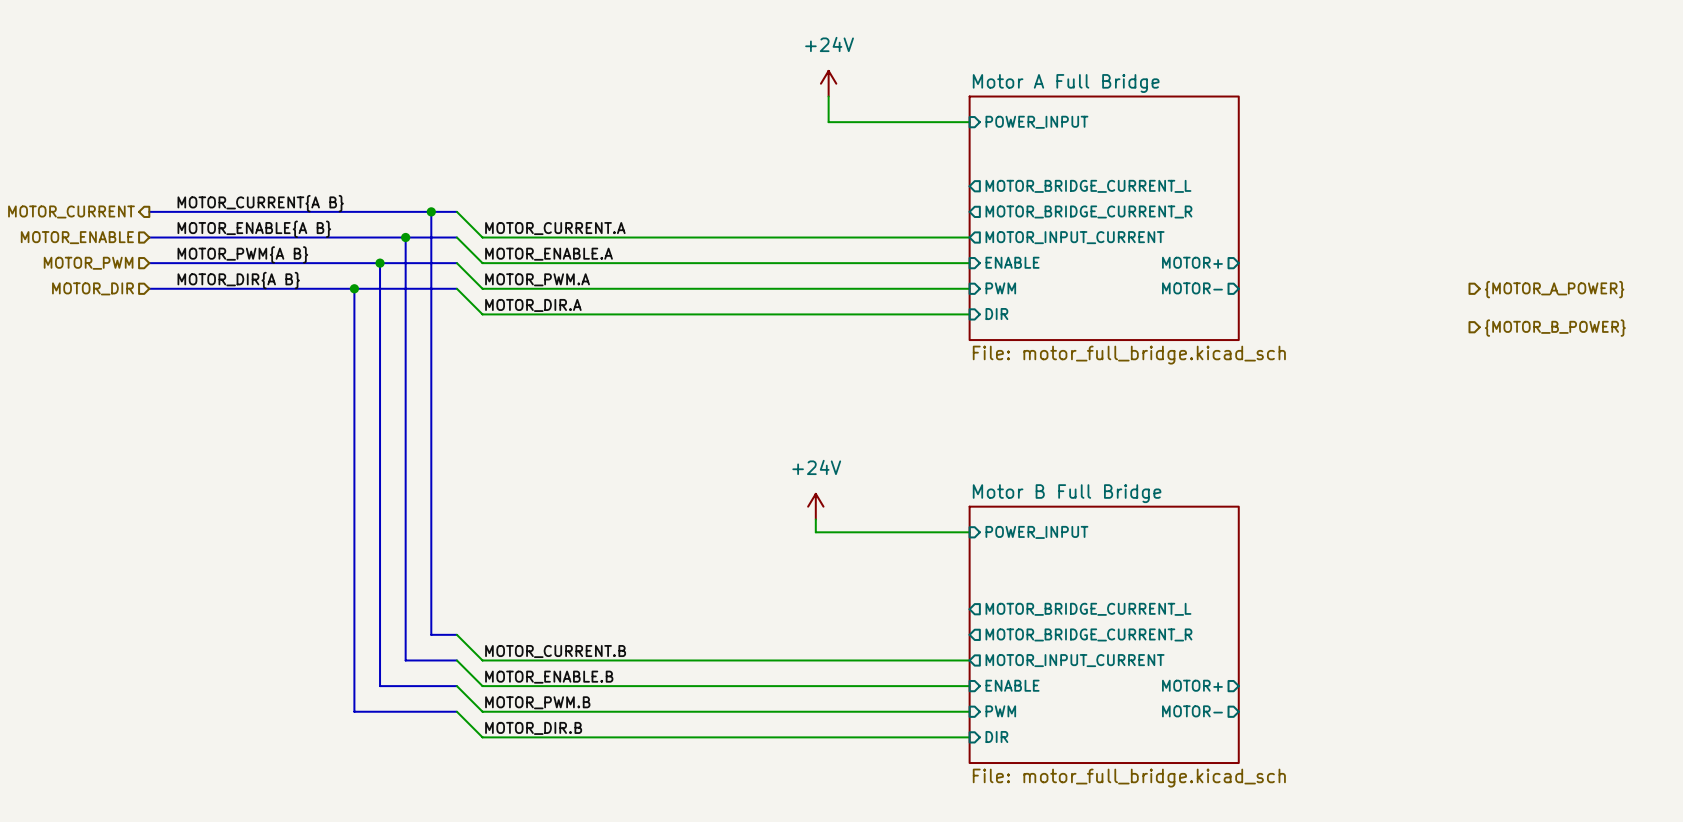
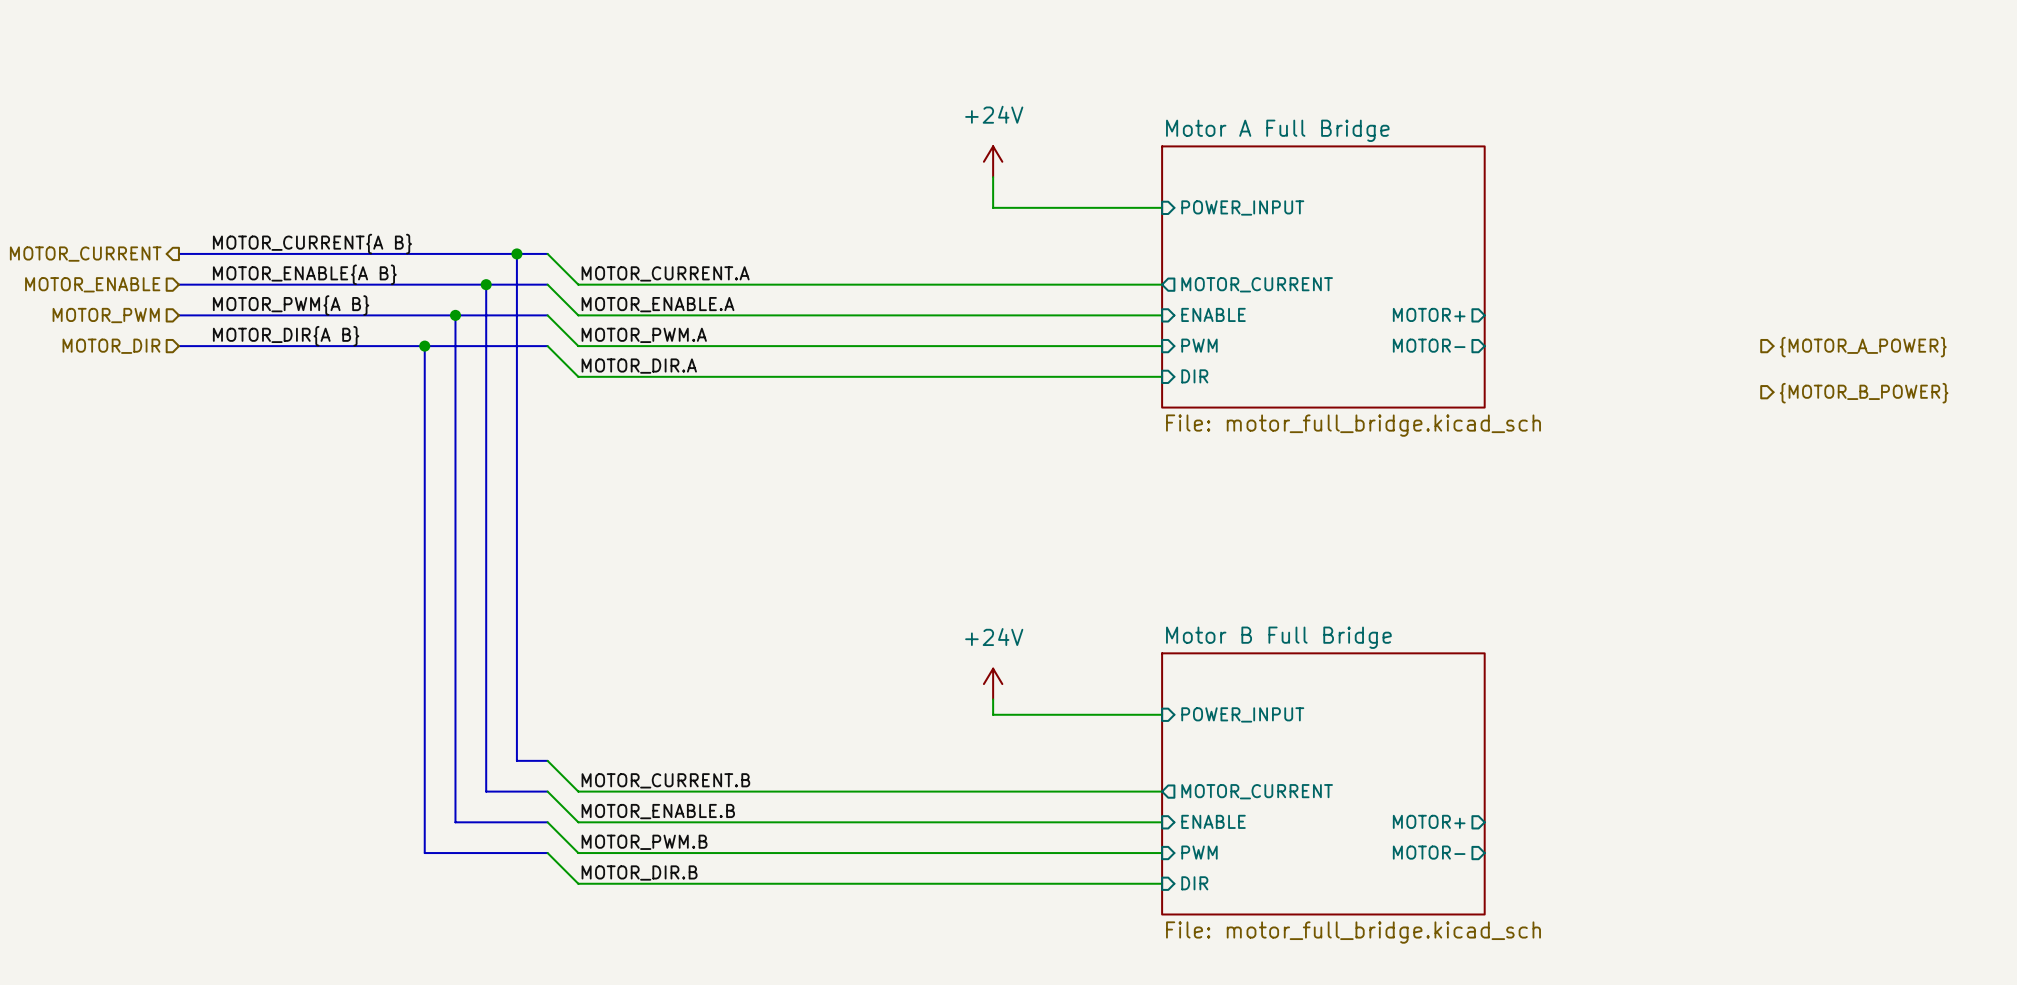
power symbol position: +24V (828, 83) -> +24V (993, 161)
wire: (828, 96) (828, 122) (969, 122) -> (993, 177) (993, 207) (1162, 207)
sheet pin position: POWER_INPUT (1036, 122) -> POWER_INPUT (1242, 207)
sheet pin: MOTOR_BRIDGE_CURRENT_L (1088, 186) -> none
sheet pin: MOTOR_BRIDGE_CURRENT_R (1088, 211) -> none
sheet Motor A Full Bridge: File: motor_full_bridge.kicad_sch (1104, 218) -> none
sheet Motor A Full Bridge: none -> File: motor_full_bridge.kicad_sch (1323, 276)
sheet pin: MOTOR_INPUT_CURRENT (1075, 237) -> MOTOR_CURRENT (1257, 284)
power symbol position: +24V (815, 506) -> +24V (993, 684)
wire: (815, 519) (815, 532) (969, 532) -> none
sheet pin position: POWER_INPUT (1036, 532) -> POWER_INPUT (1242, 714)
wire: none -> (993, 699) (993, 714) (1162, 714)
sheet pin: MOTOR_BRIDGE_CURRENT_L (1088, 609) -> none
sheet pin: MOTOR_BRIDGE_CURRENT_R (1088, 634) -> none
sheet Motor B Full Bridge: File: motor_full_bridge.kicad_sch (1104, 634) -> none
sheet Motor B Full Bridge: none -> File: motor_full_bridge.kicad_sch (1323, 783)
sheet pin: MOTOR_INPUT_CURRENT (1075, 660) -> MOTOR_CURRENT (1257, 791)

